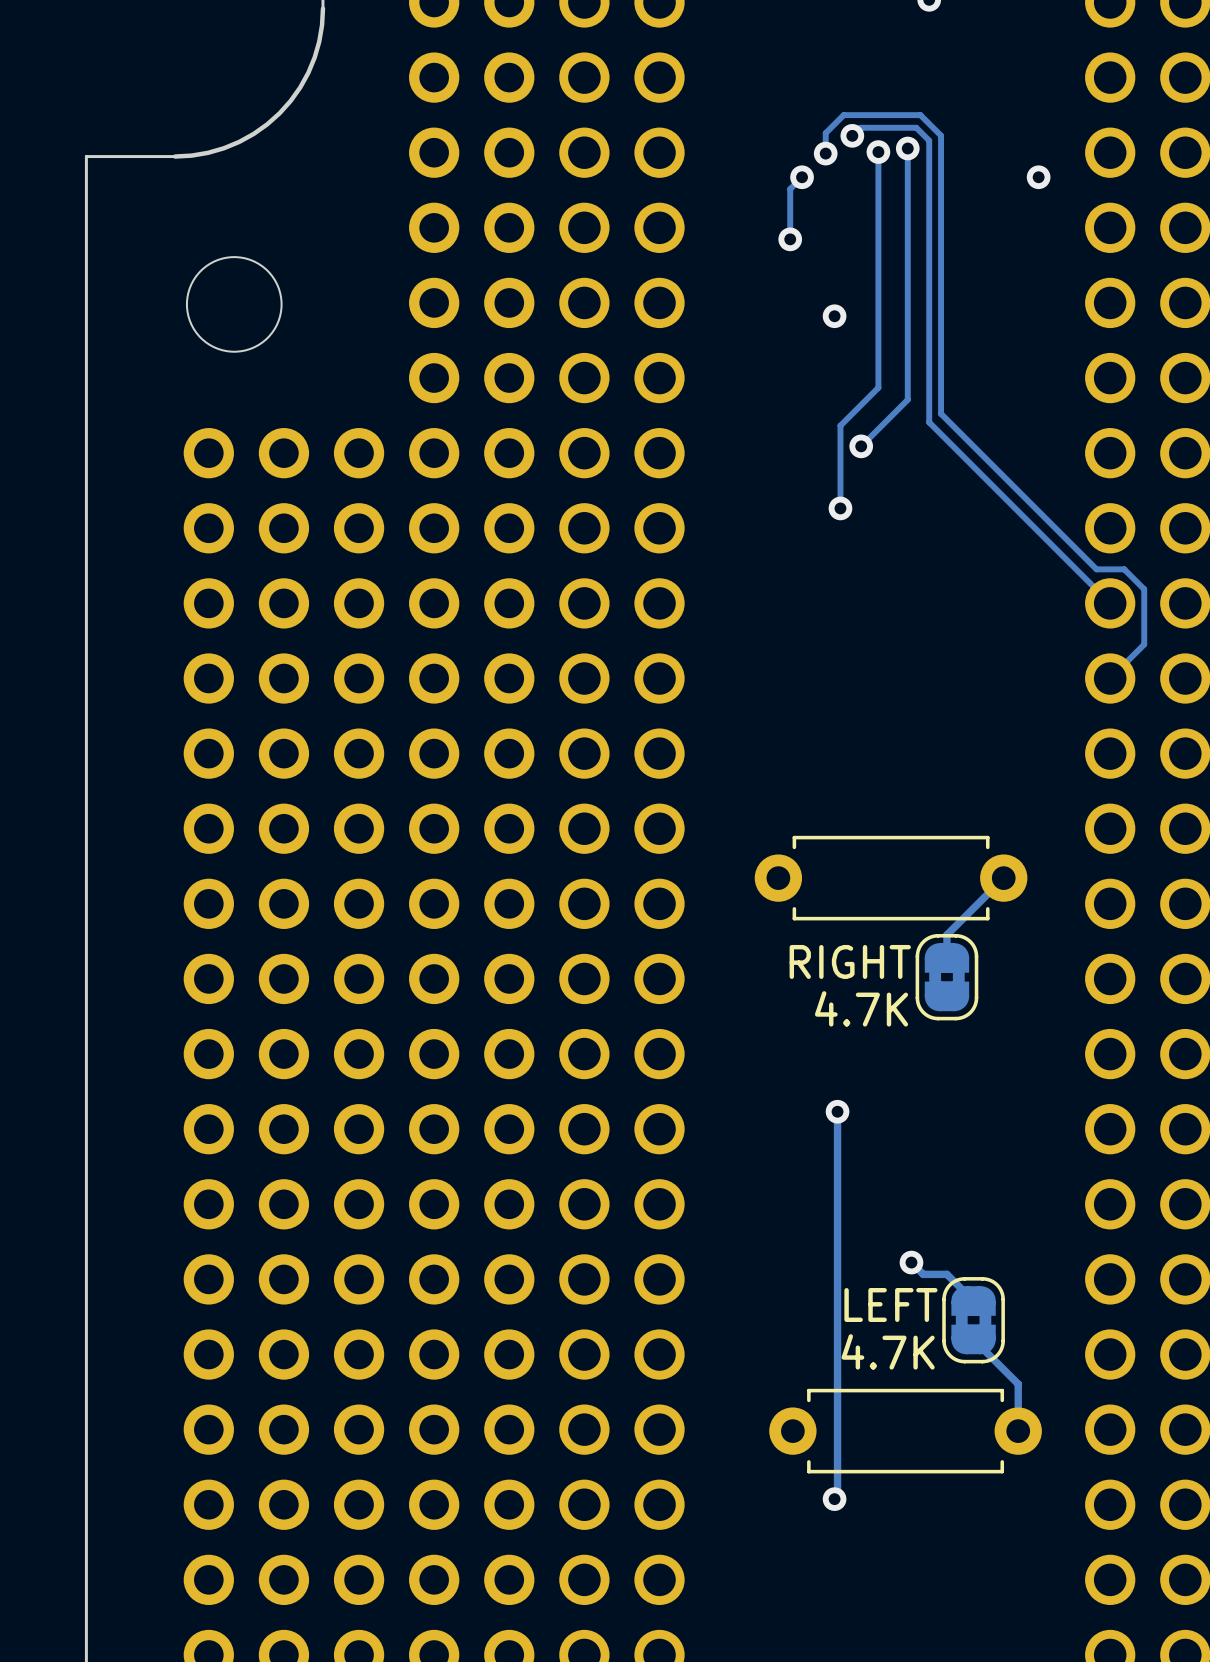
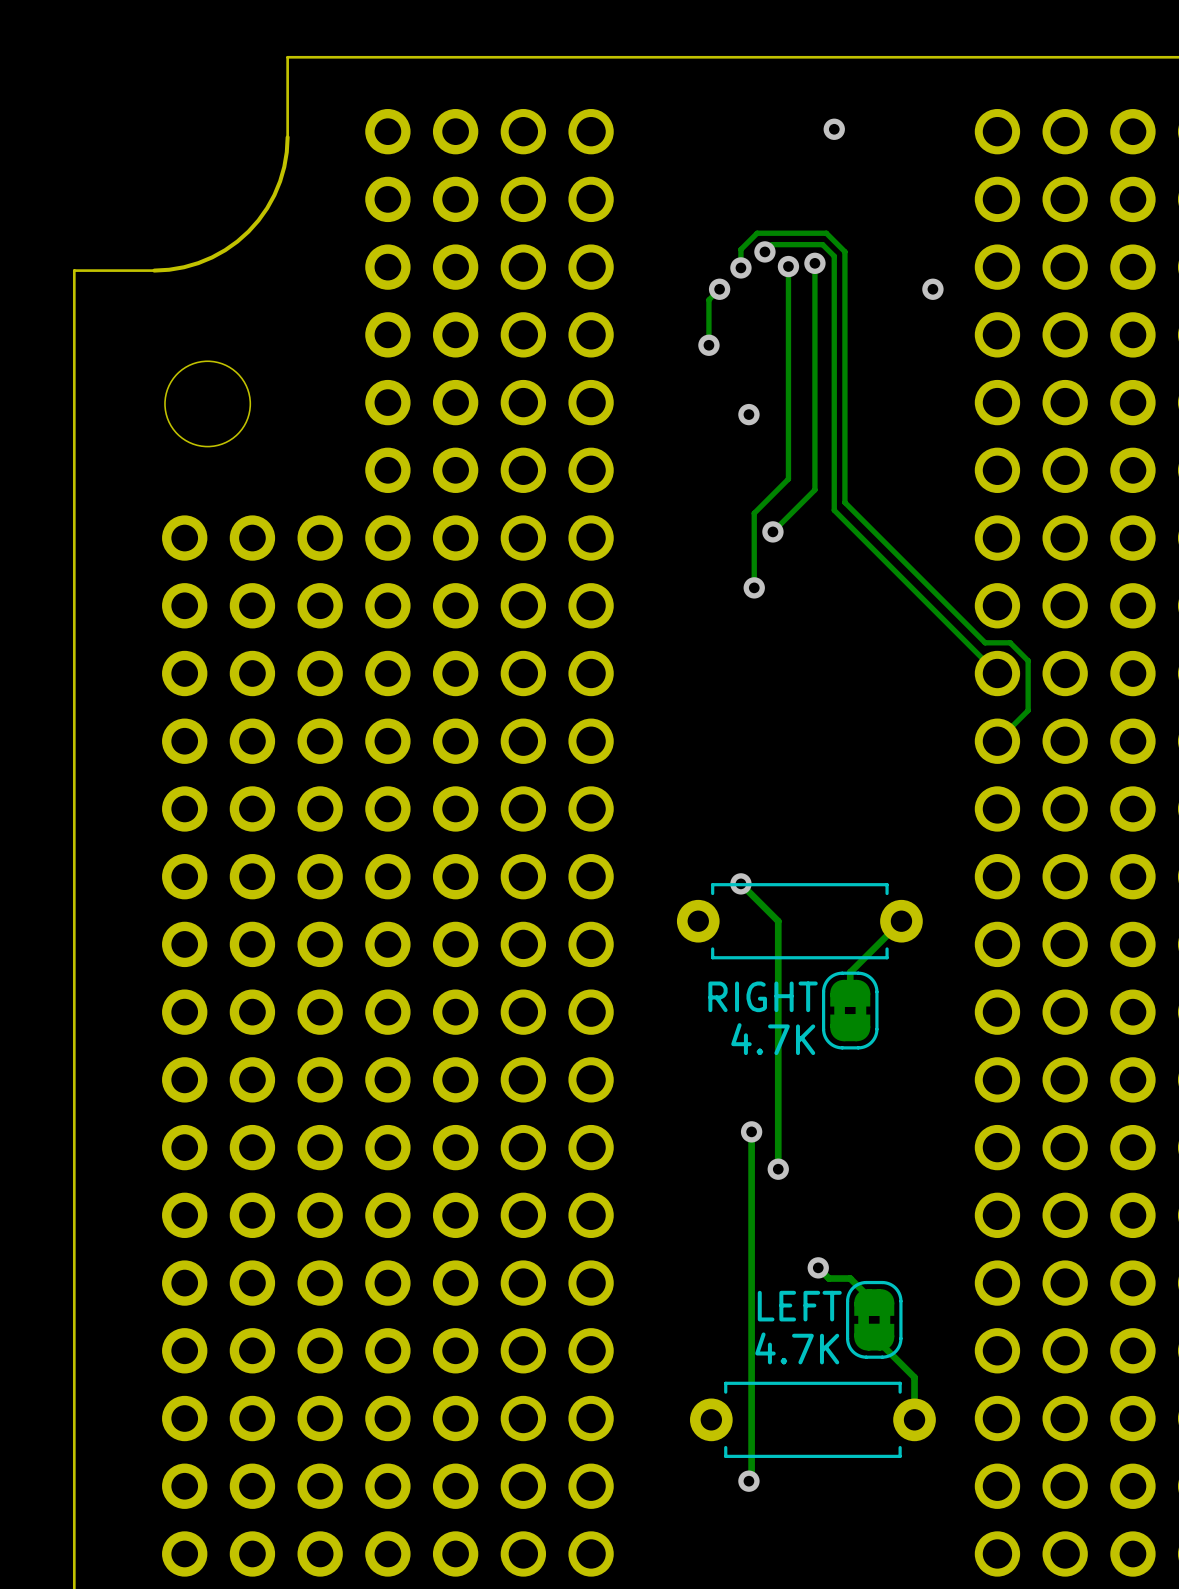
track: none -> (740, 883) (778, 921) (778, 1169)
via: none -> (740, 883)
via: none -> (778, 1169)

